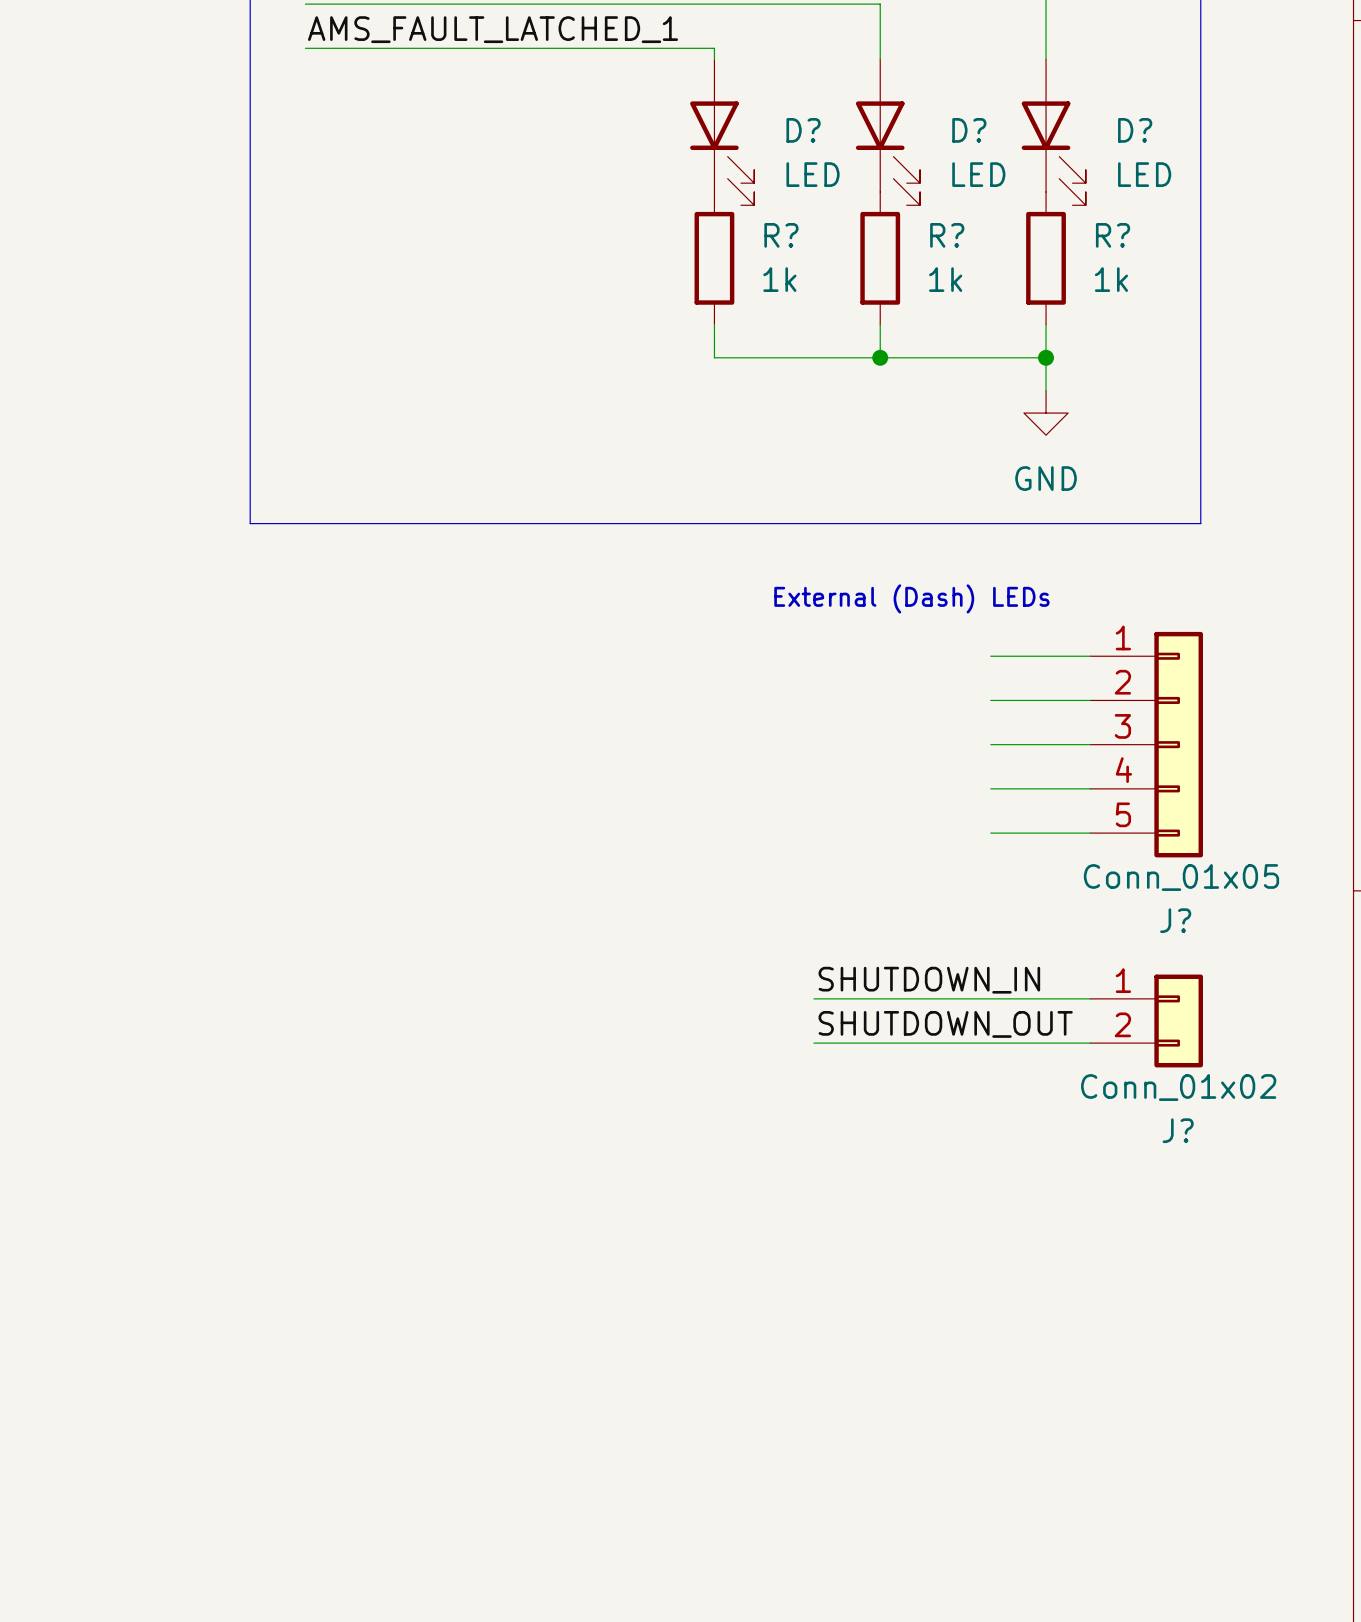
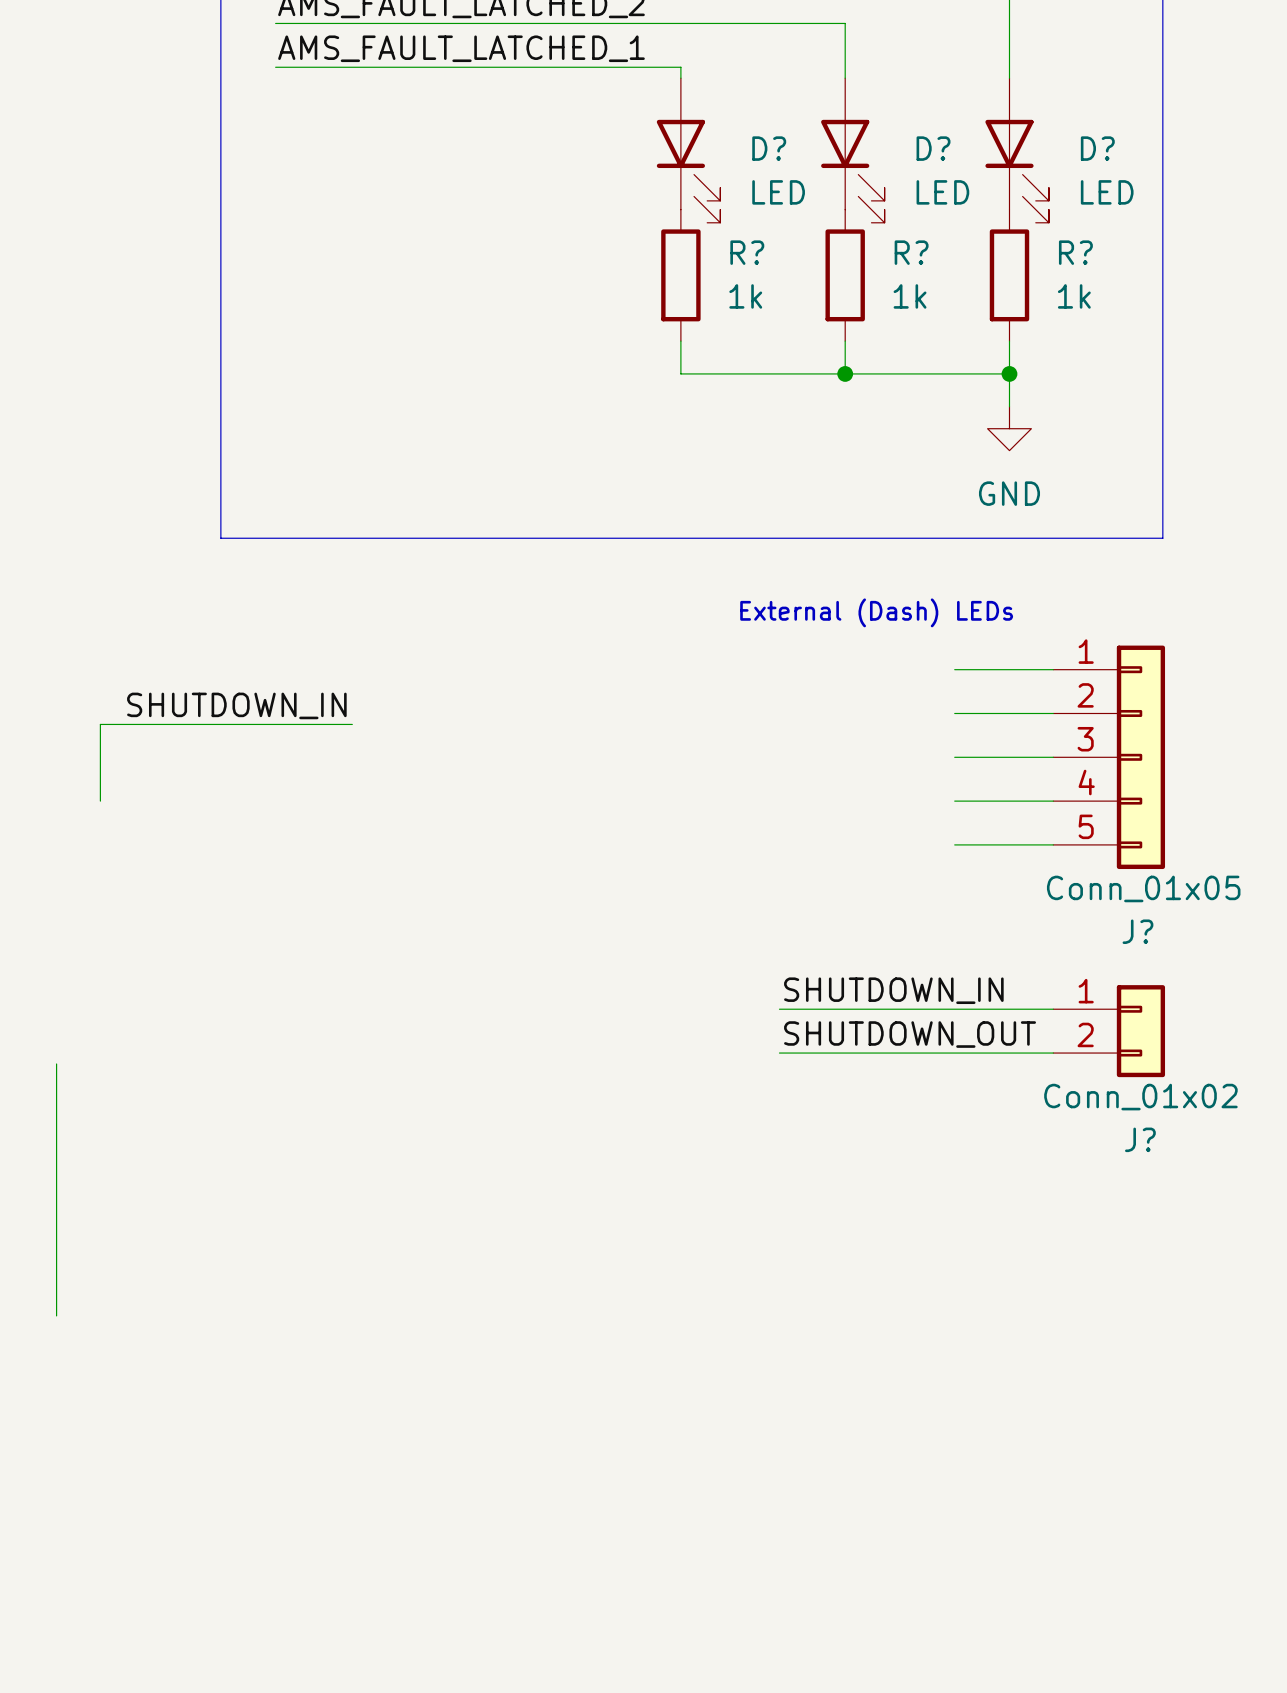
label: none -> SHUTDOWN_IN (236, 705)
wire: none -> (352, 724) (100, 724) (100, 801)
wire: none -> (56, 1063) (56, 1315)

